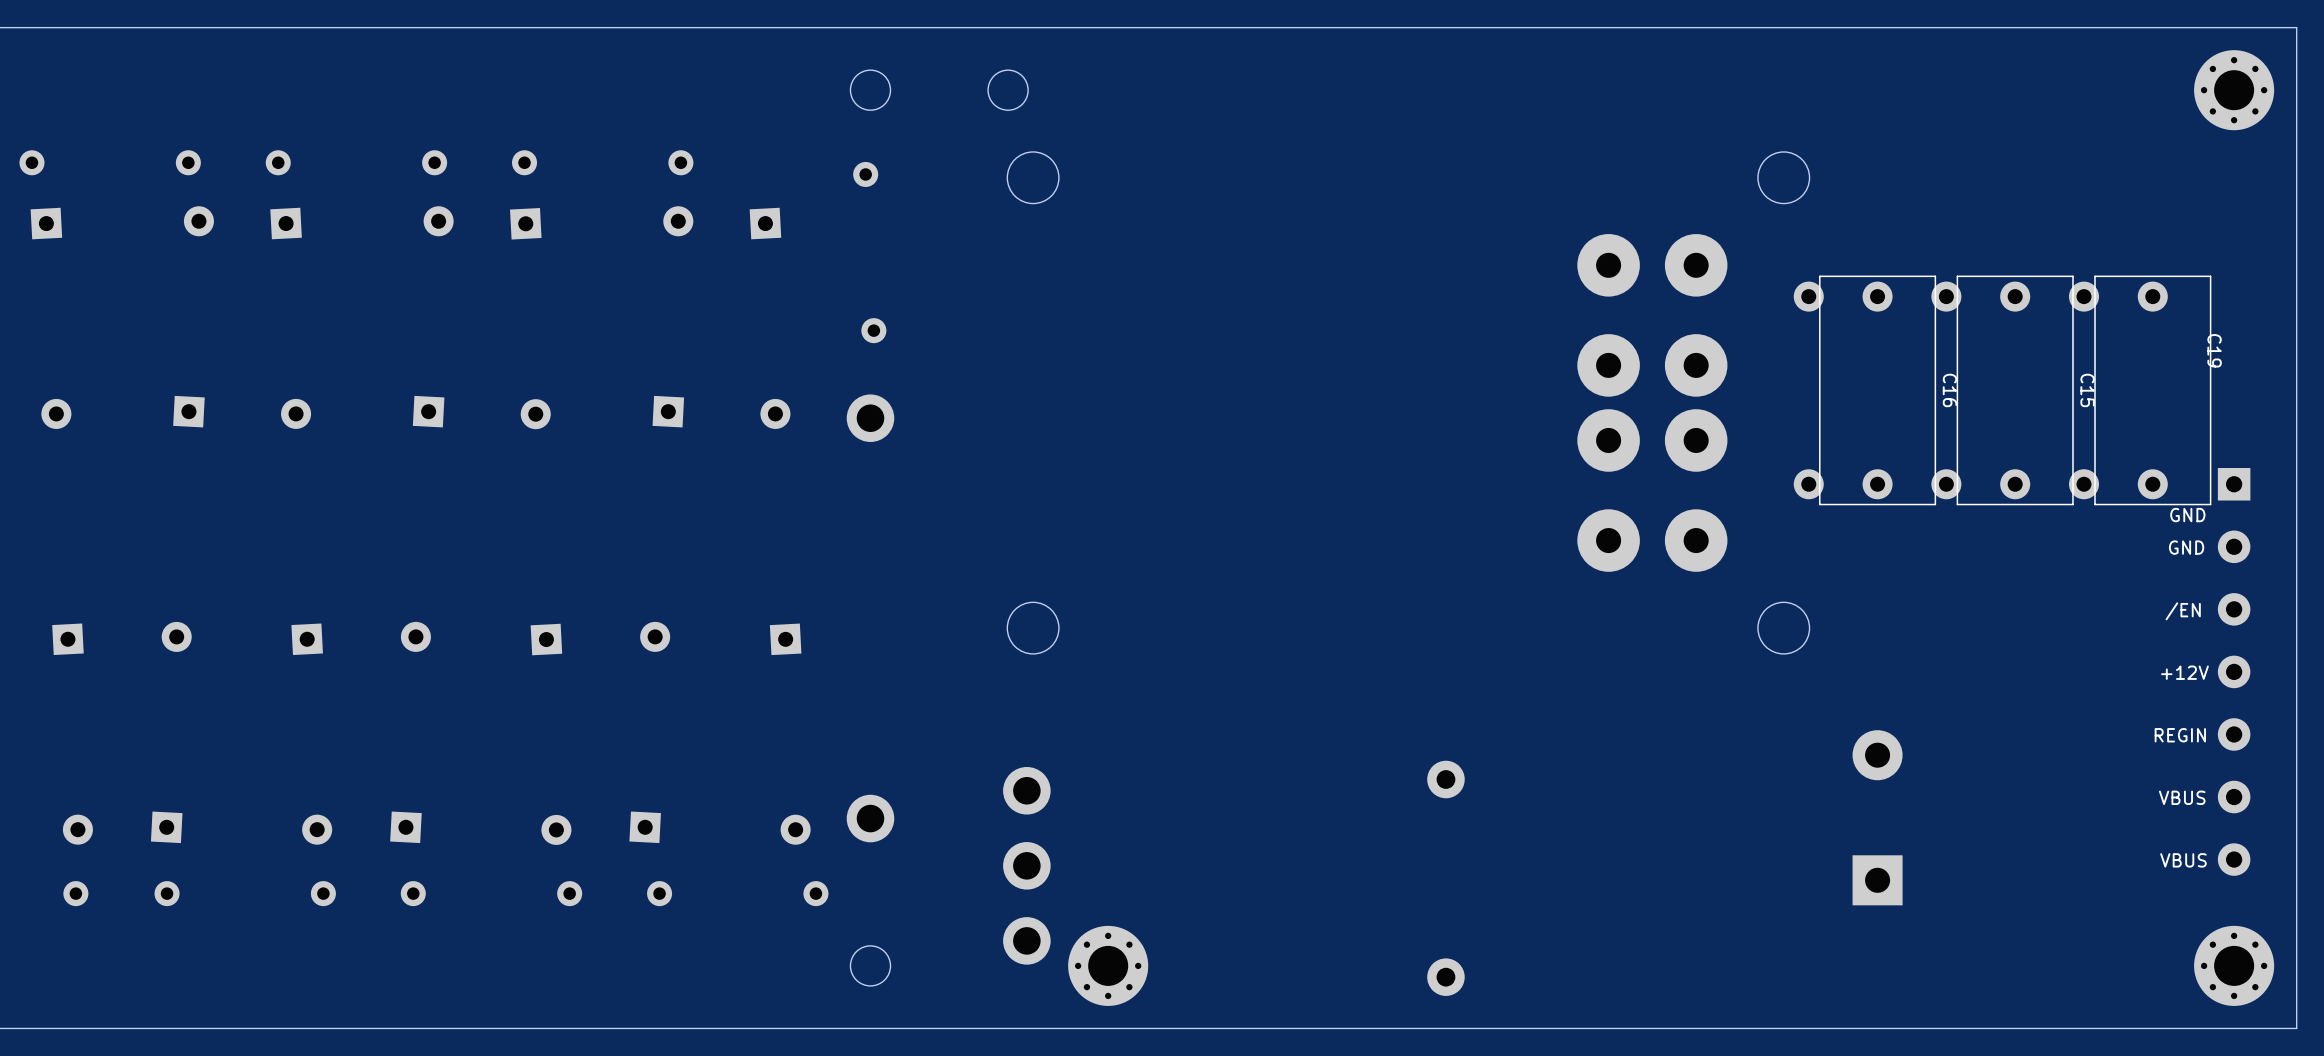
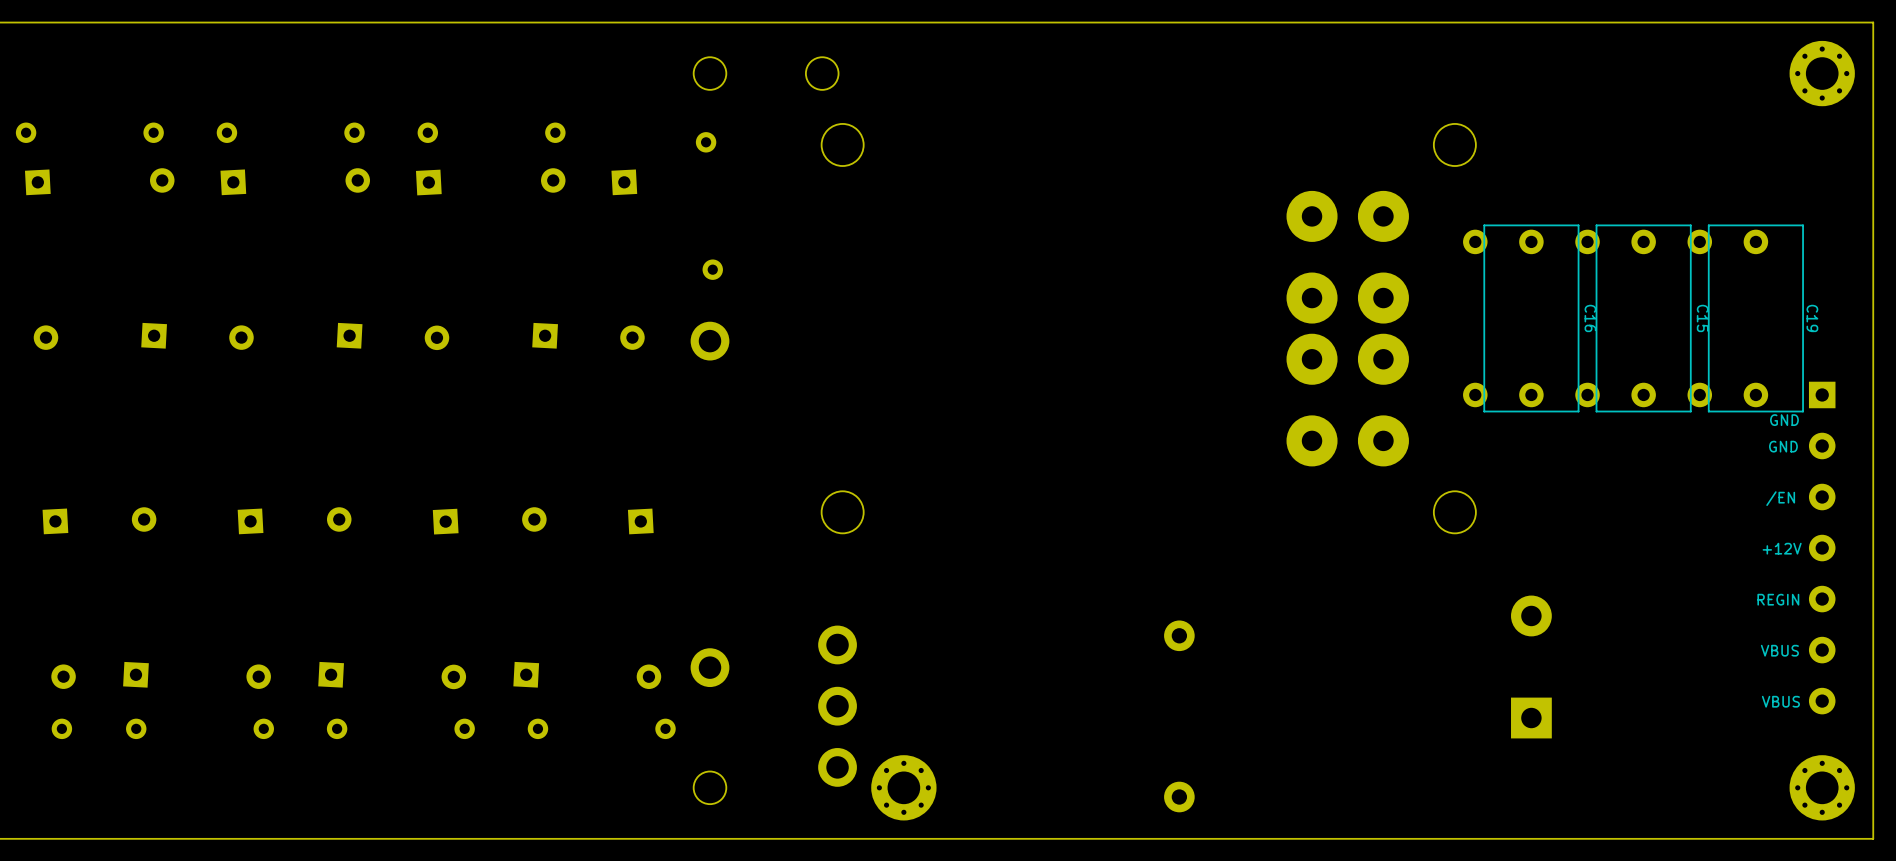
C19 name position: C19 (2214, 350) -> C19 (1812, 318)

